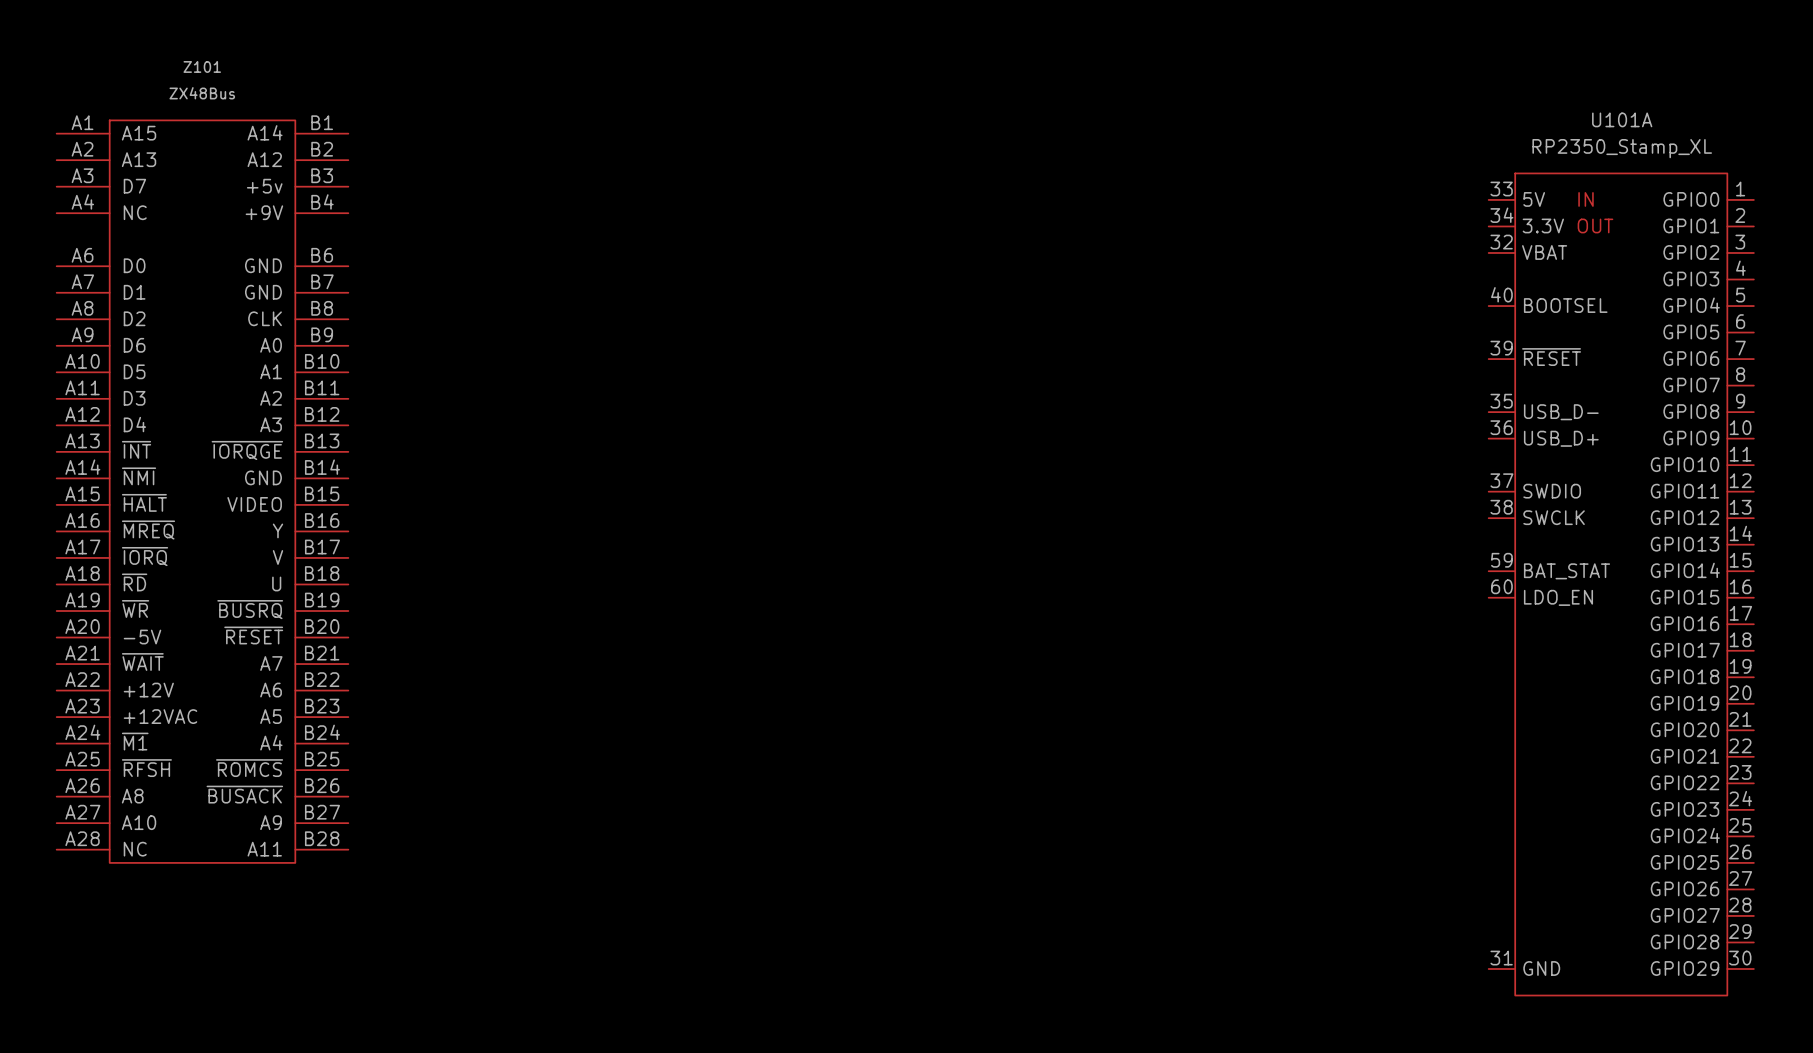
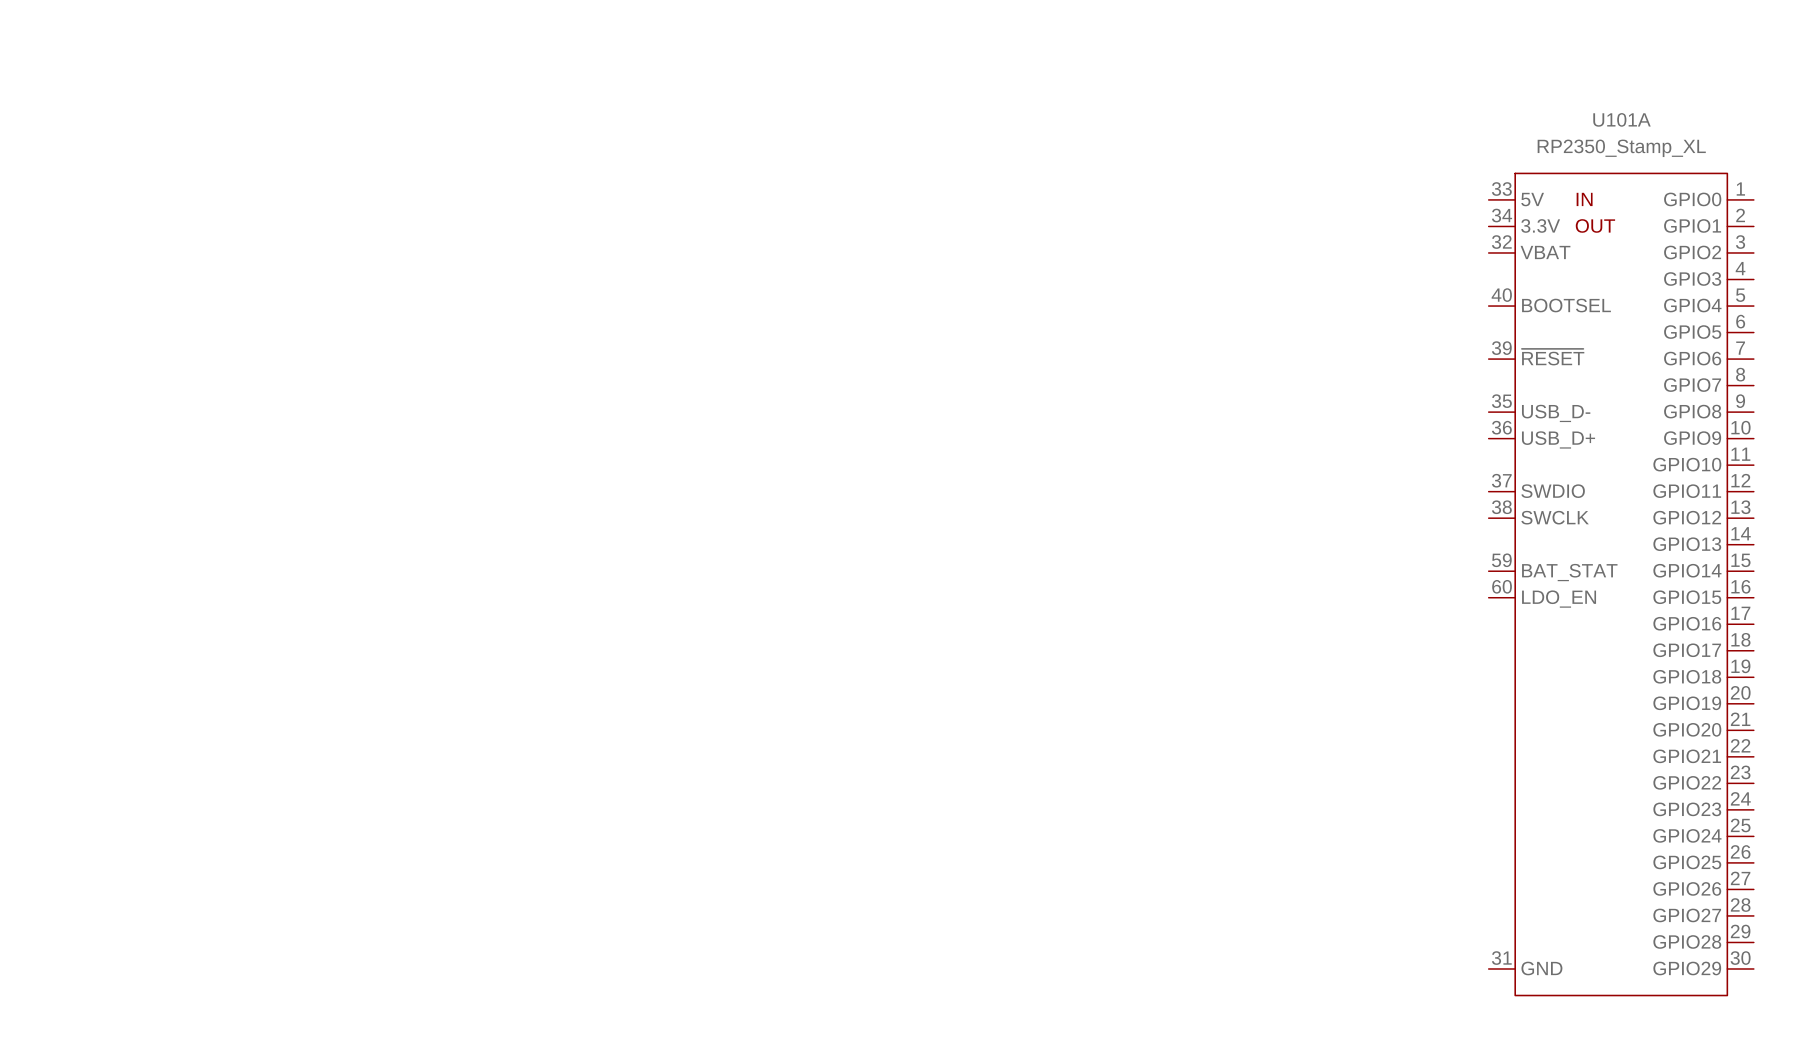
Z101: ZX48Bus (202, 491) -> none

